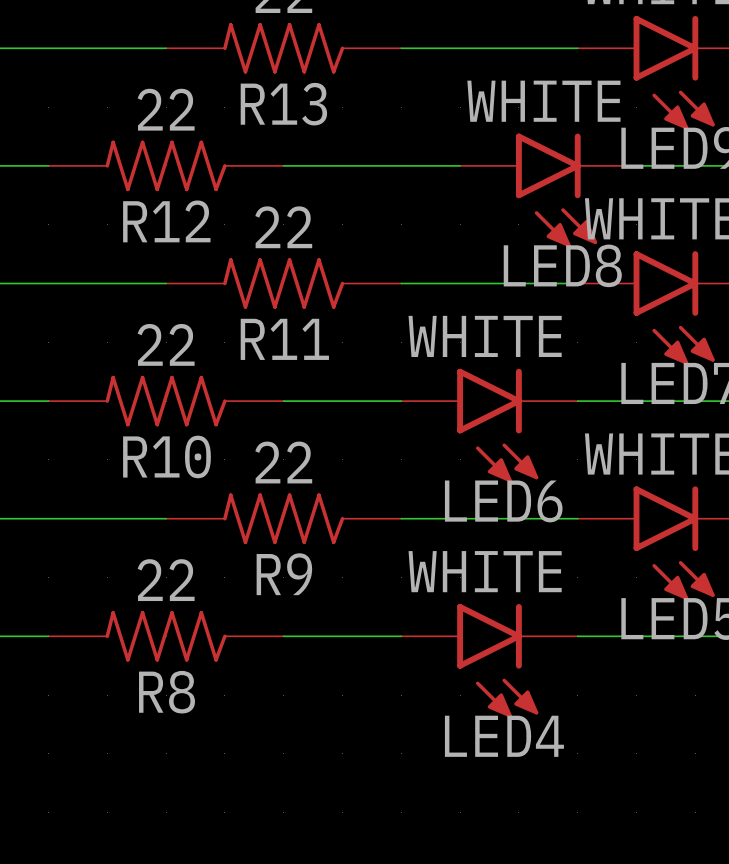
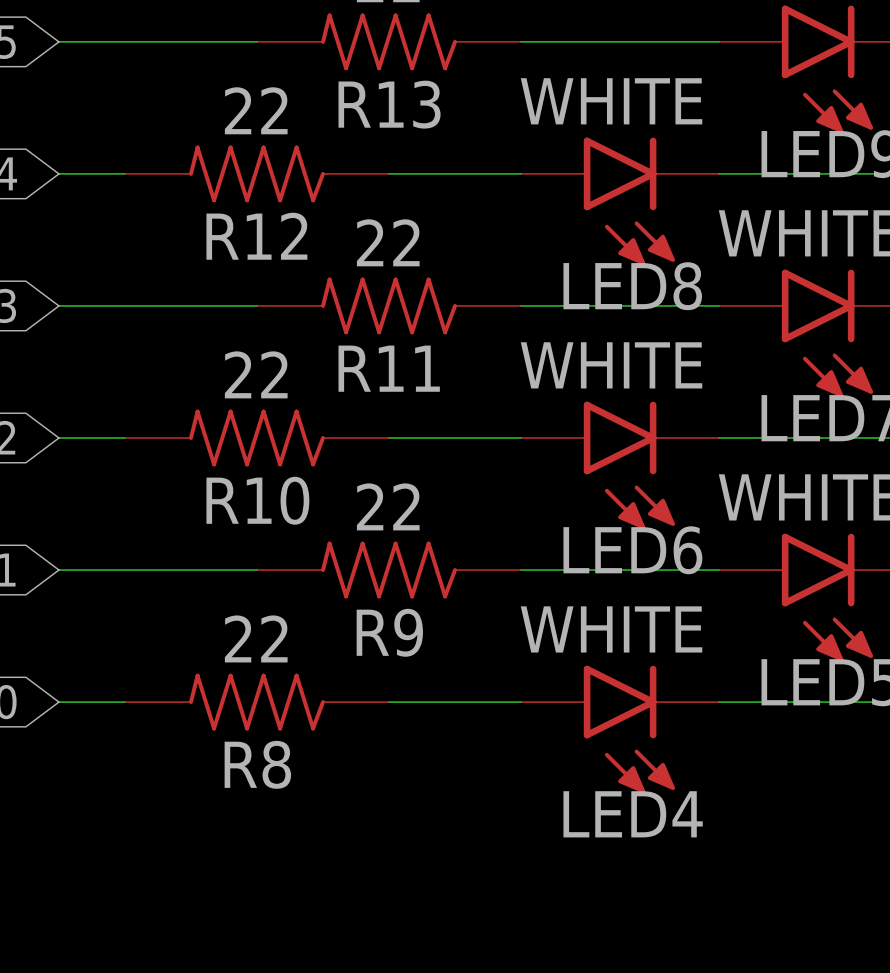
LED8 position: (548, 190) -> (620, 201)

